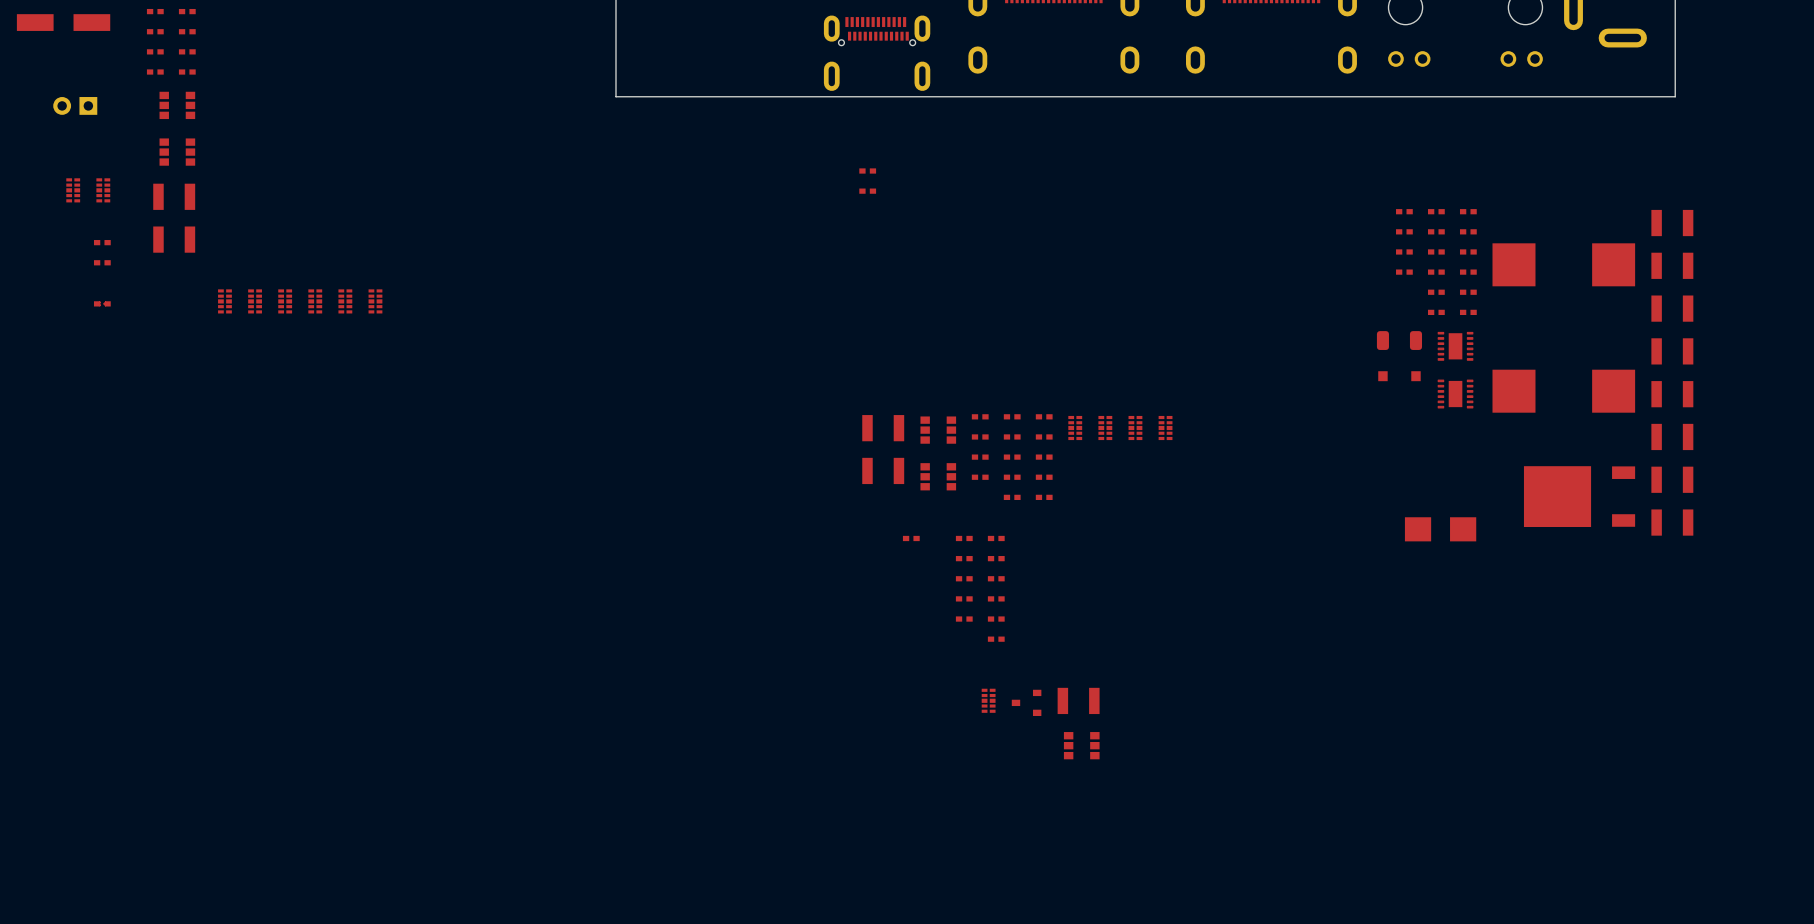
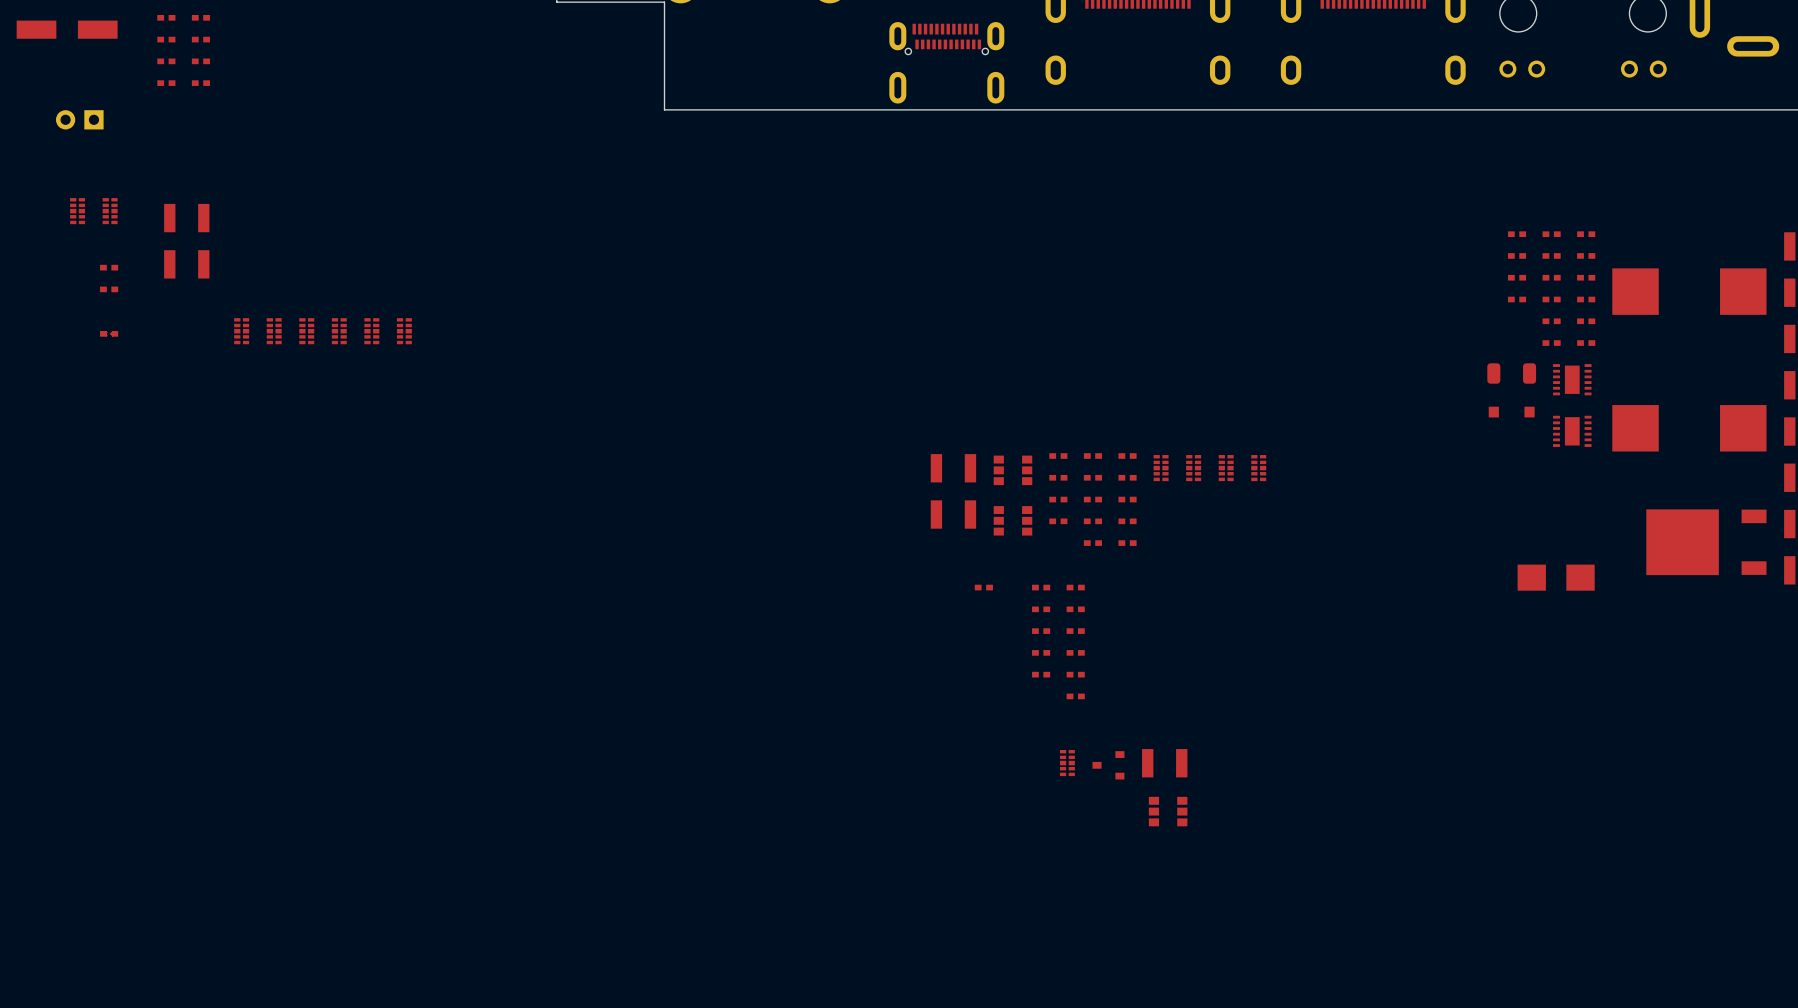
part: (177, 105) -> none
part: (177, 152) -> none
part: (867, 171) -> none
part: (867, 191) -> none

